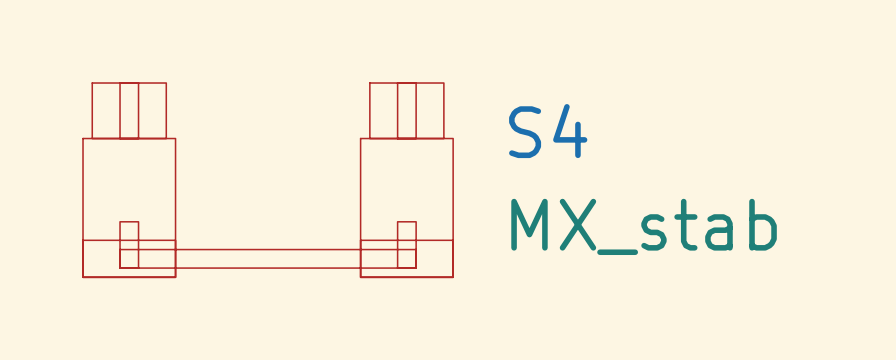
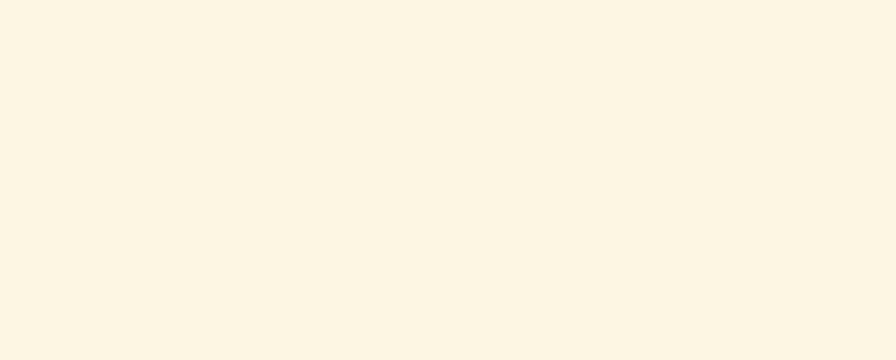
S4: MX_stab (268, 180) -> none

